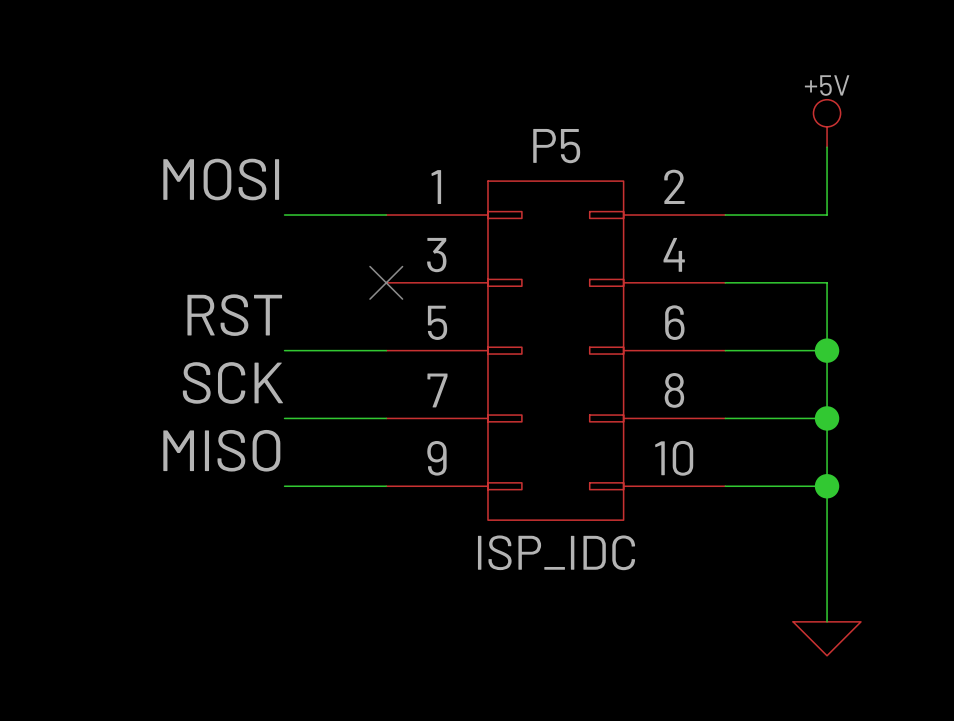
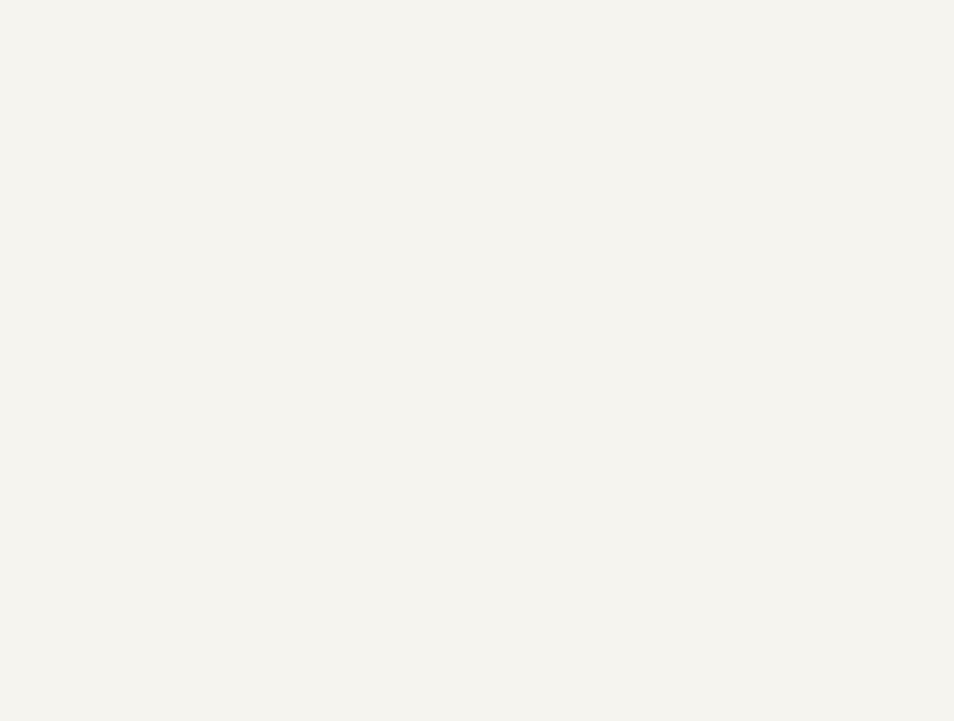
power symbol: +5V (827, 123) -> none
wire: (827, 147) (827, 215) (725, 215) -> none
label: MOSI (221, 179) -> none
wire: (284, 215) (386, 215) -> none
no-connect mark: (386, 282) -> none
wire: (725, 282) (827, 282) (827, 621) -> none
label: RST (234, 315) -> none
wire: (284, 350) (386, 350) -> none
P5: ISP_IDC (555, 350) -> none
wire: (725, 350) (827, 350) -> none
junction: (827, 350) -> none
label: SCK (232, 382) -> none
wire: (284, 418) (386, 418) -> none
wire: (725, 418) (827, 418) -> none
junction: (827, 418) -> none
label: MISO (221, 450) -> none
wire: (284, 486) (386, 486) -> none
wire: (725, 486) (827, 486) -> none
junction: (827, 486) -> none
power symbol: (827, 638) -> none

